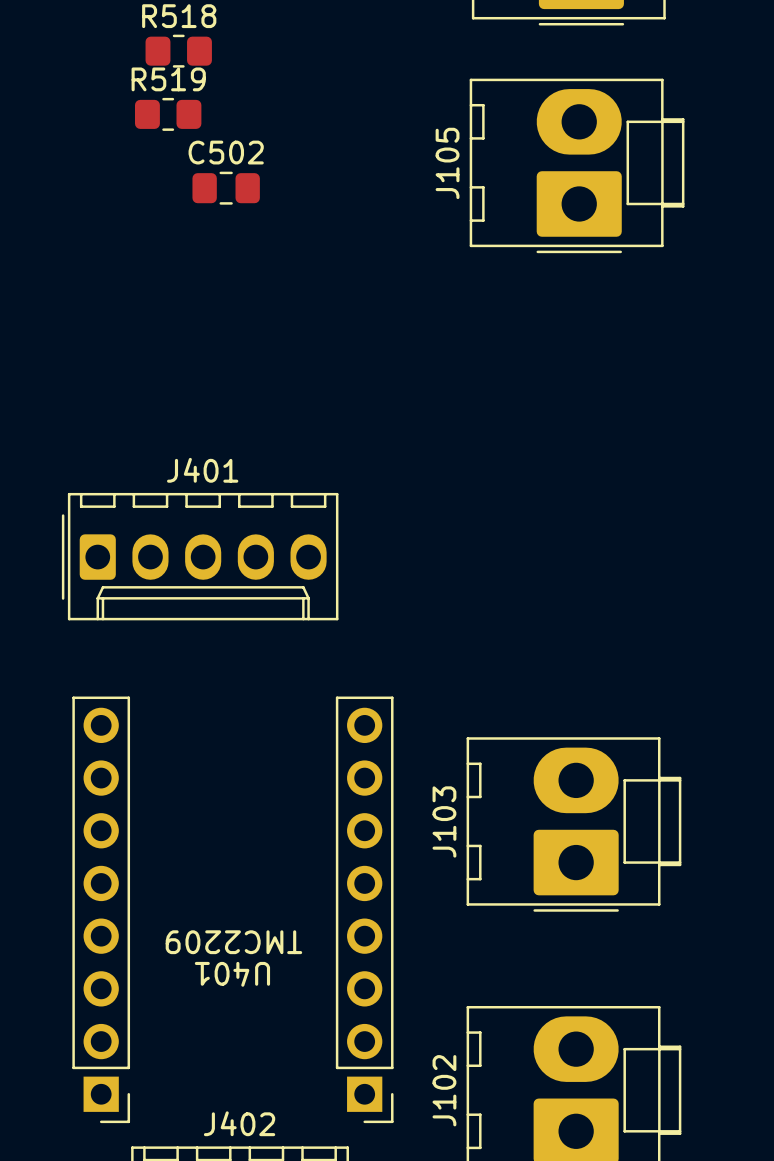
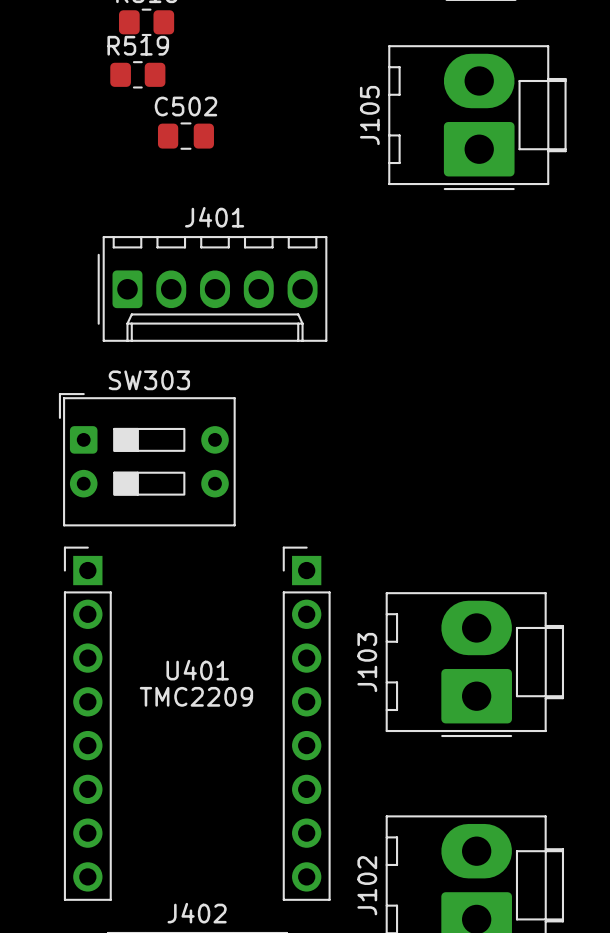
J401 position: (200, 556) -> (212, 288)
SW303: none -> (147, 459)
U401 rotation: 0° (232, 909) -> 180° (197, 723)

